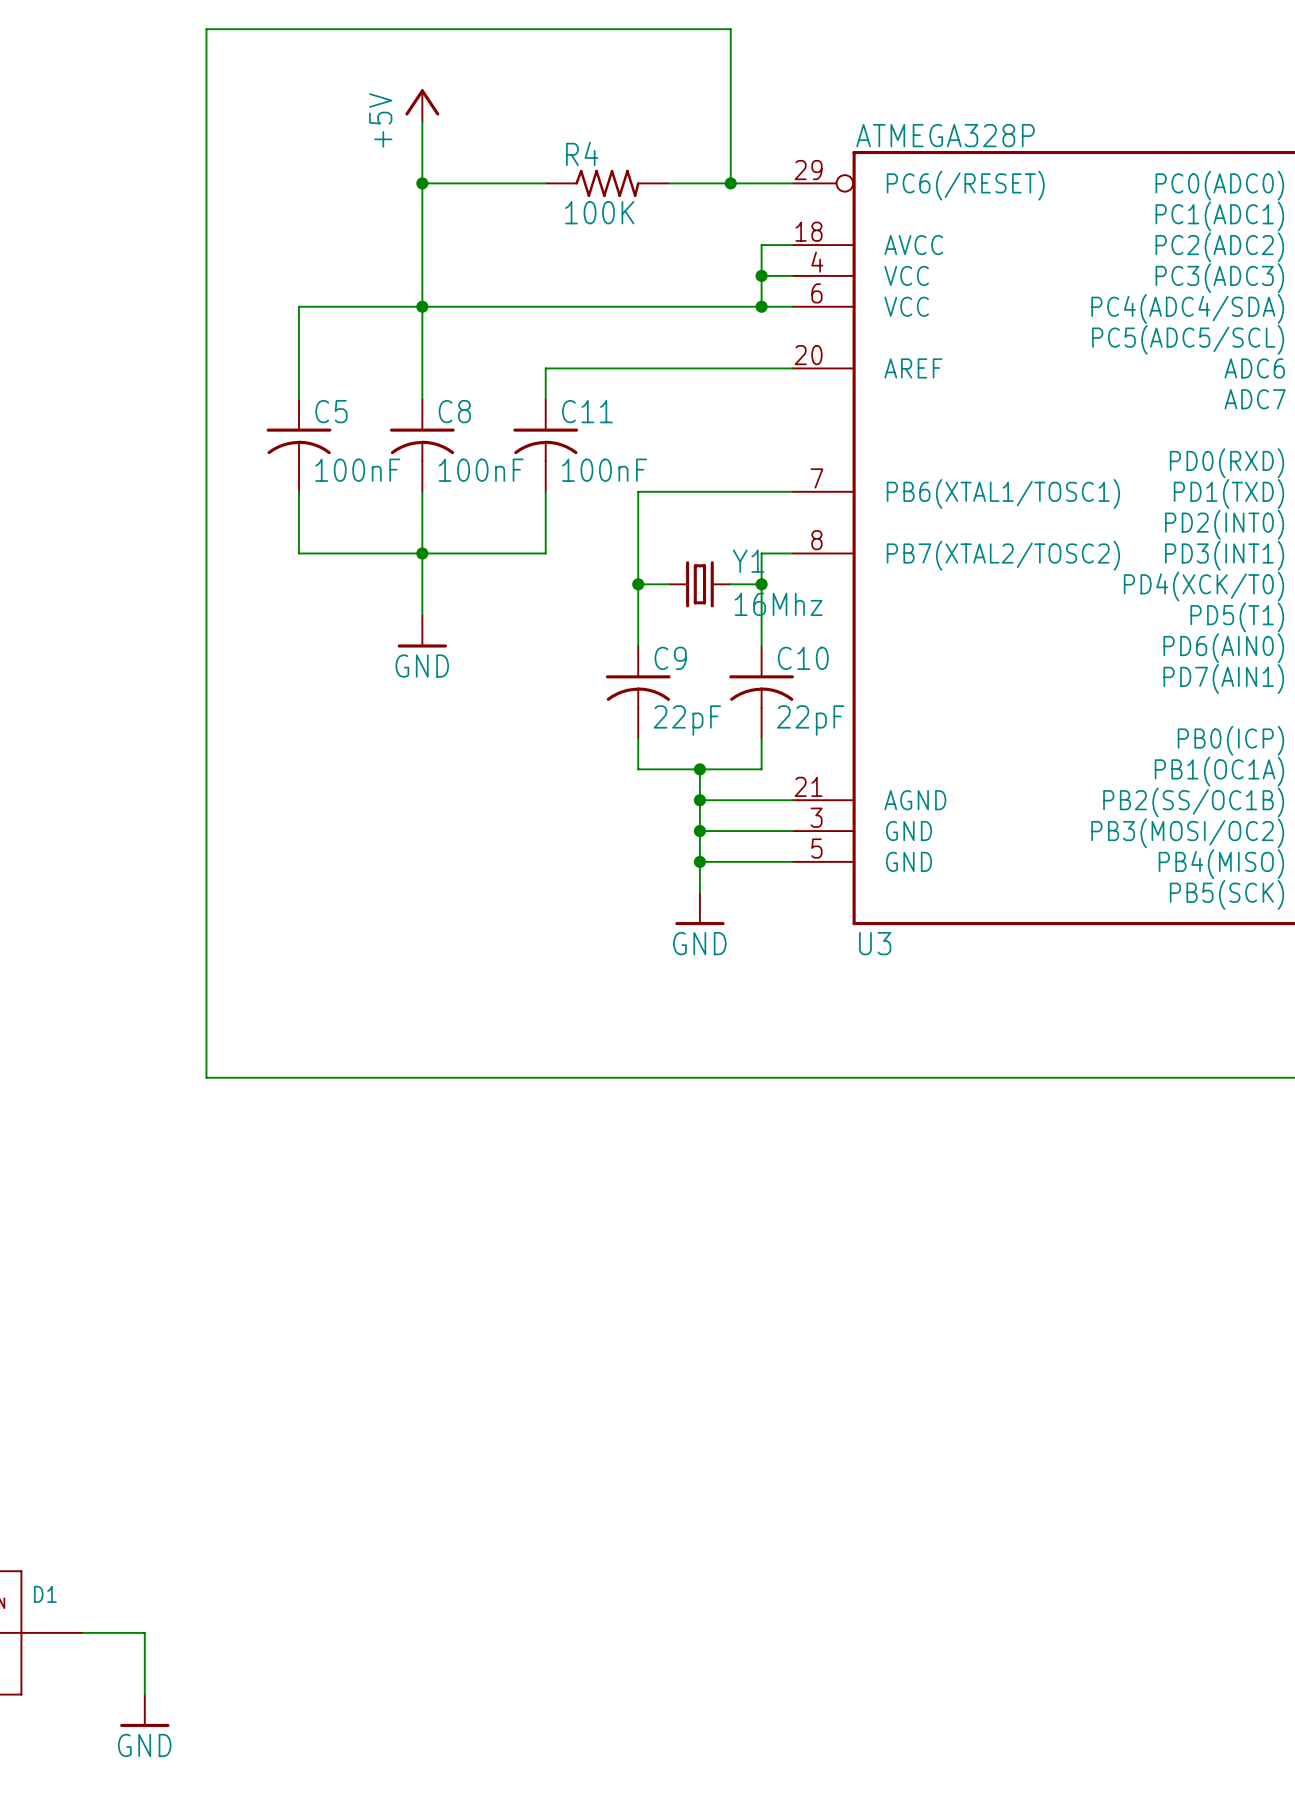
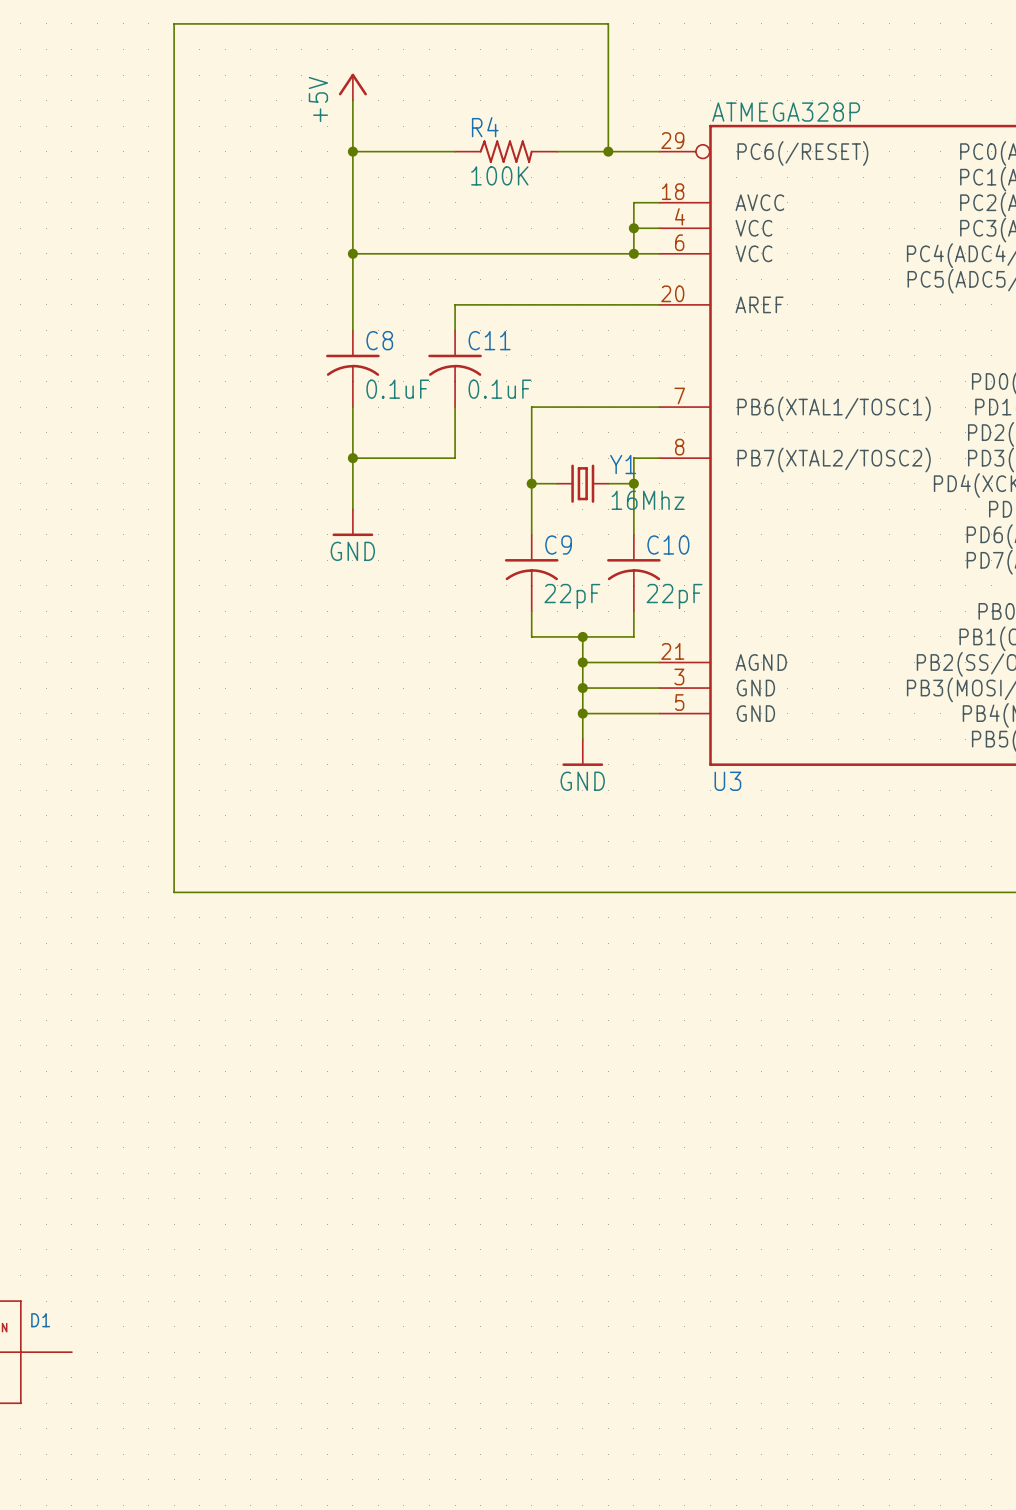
wire: (422, 306) (298, 306) (298, 399) -> none
C5: 100nF (298, 445) -> none
C8 value: 100nF (481, 470) -> 0.1uF (397, 389)
C11 value: 100nF (604, 470) -> 0.1uF (499, 389)
wire: (298, 491) (298, 553) (422, 553) -> none
wire: (83, 1632) (144, 1632) (144, 1694) -> none
power symbol: GND (144, 1710) -> none

